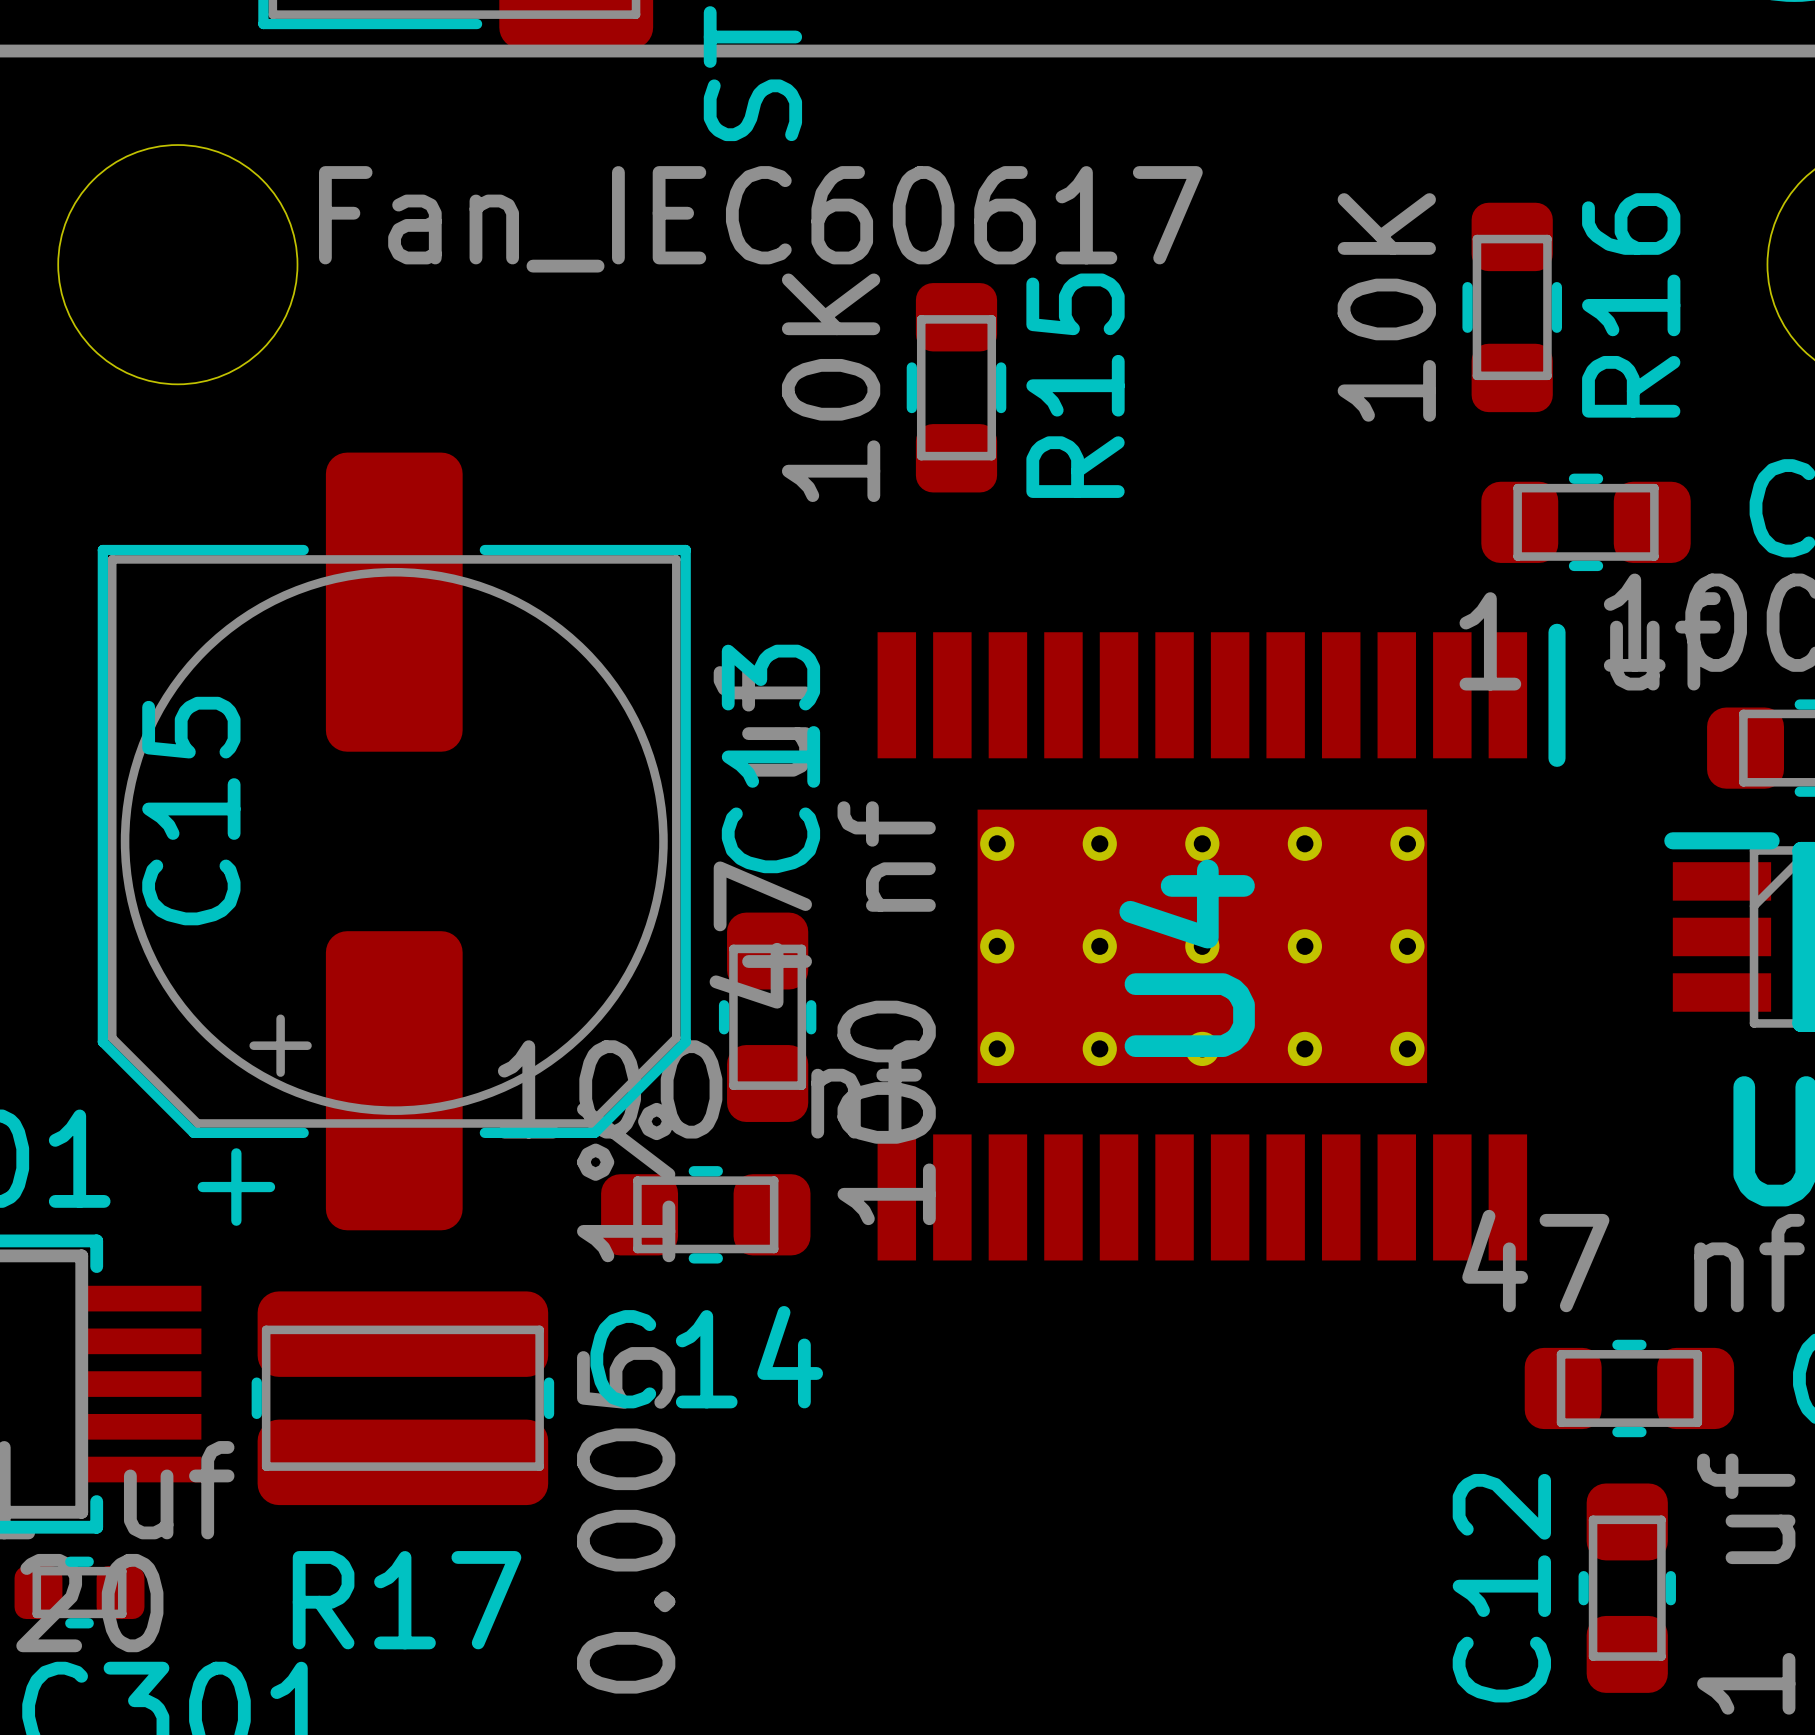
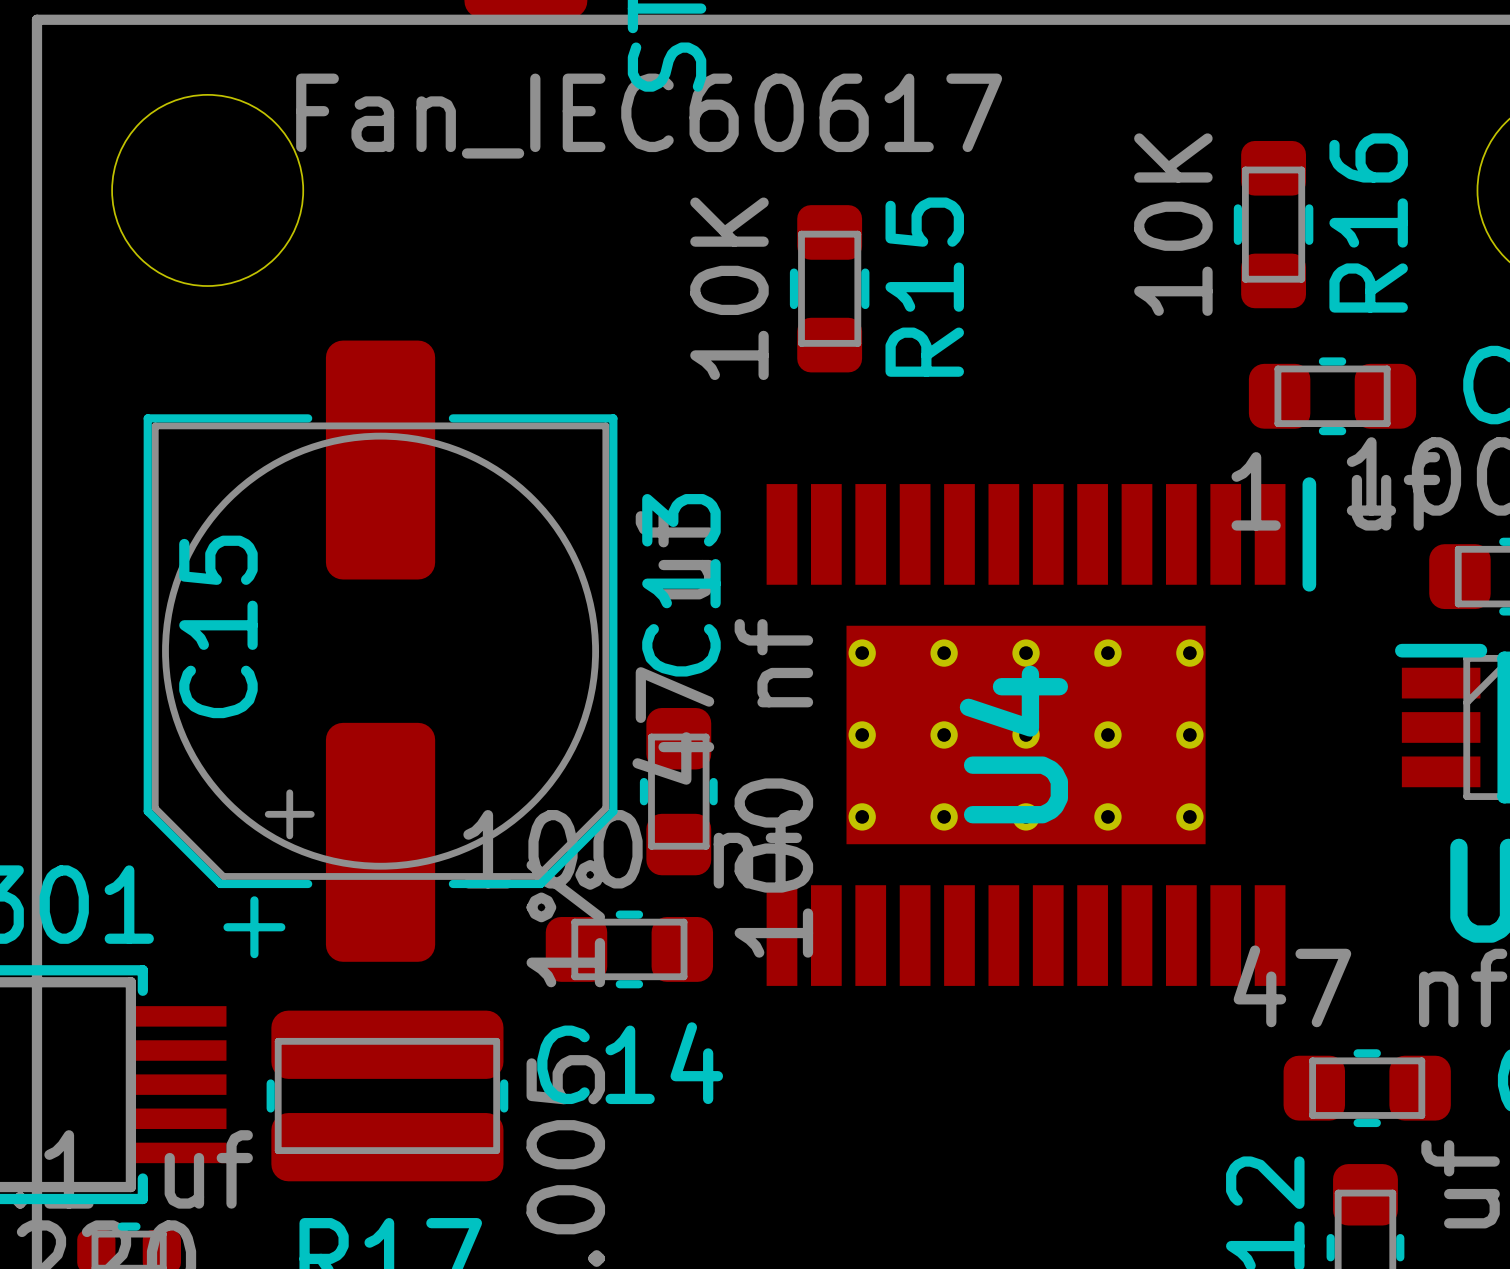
part value position: Fan_IEC60617 (760, 219) -> Fan_IEC60617 (649, 116)

